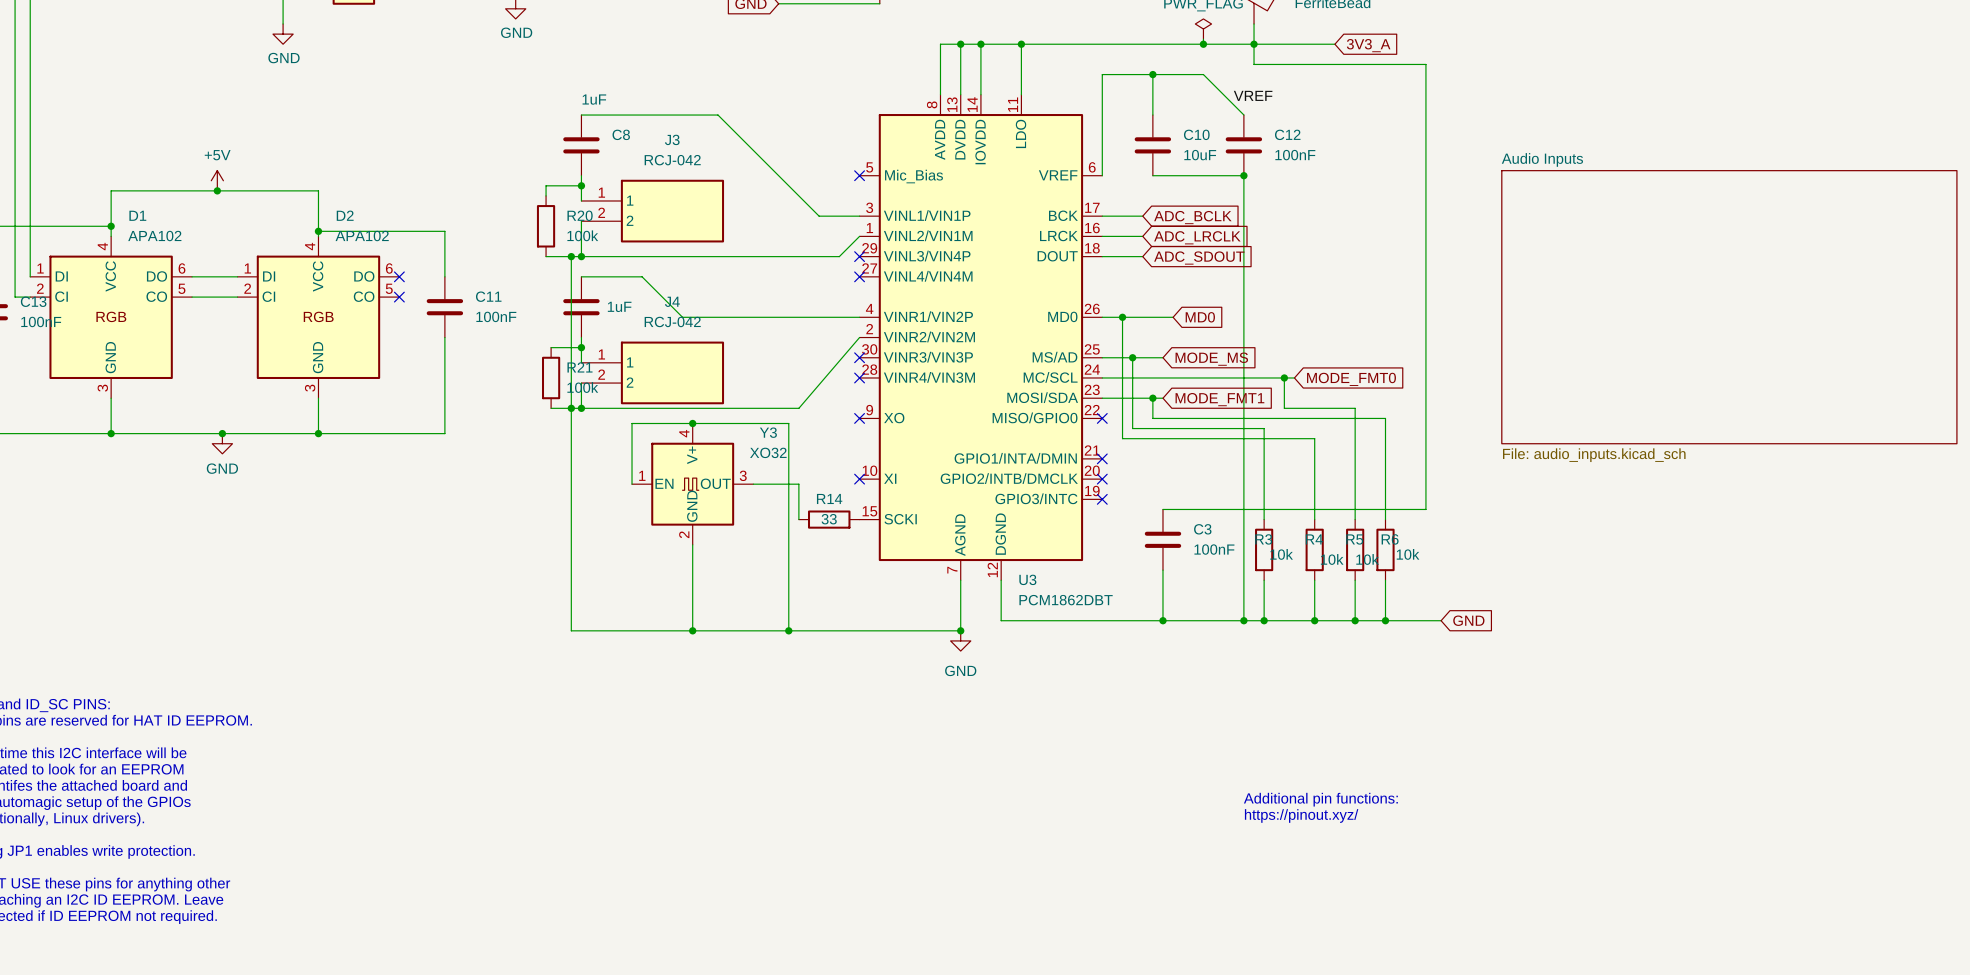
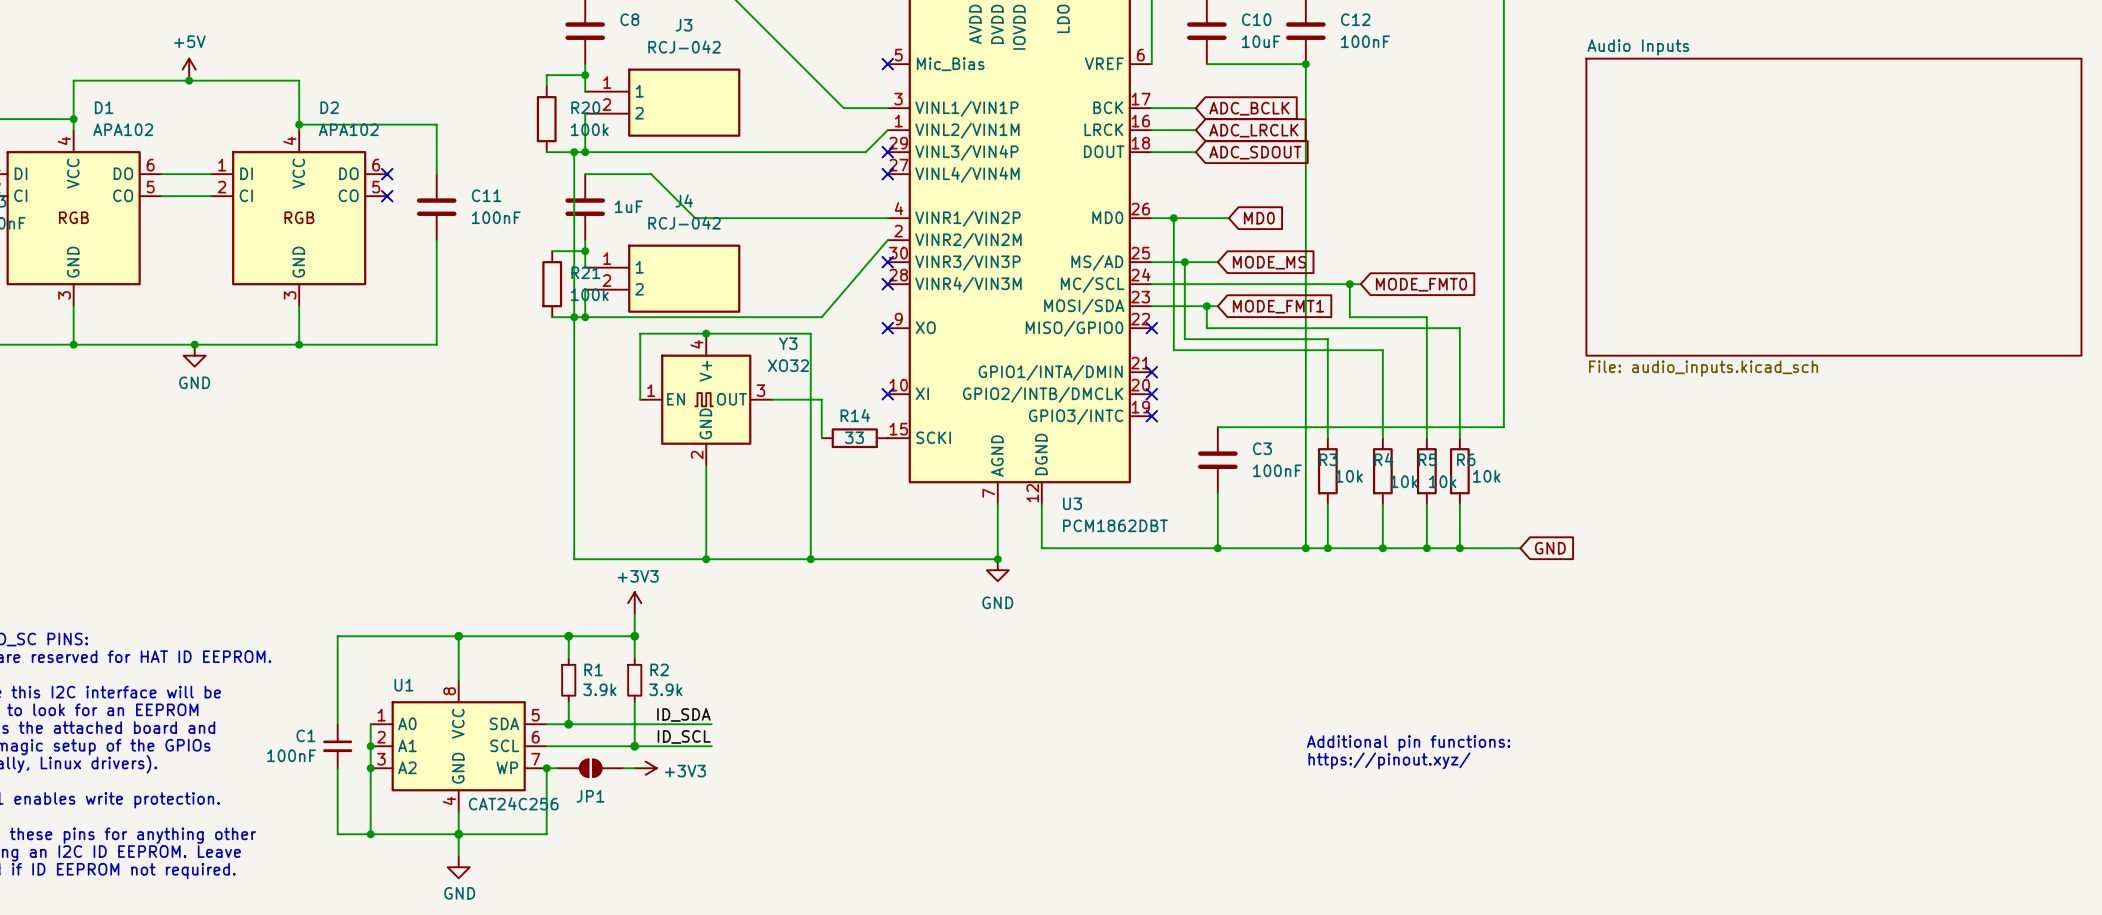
power symbol: none -> +3V3 (634, 603)
wire: none -> (634, 614) (634, 658)
wire: none -> (458, 636) (458, 680)
junction: none -> (458, 636)
wire: none -> (568, 636) (568, 658)
junction: none -> (568, 636)
wire: none -> (634, 636) (337, 636) (337, 724)
junction: none -> (634, 636)
R1: none -> 3.9k (568, 680)
R2: none -> 3.9k (634, 680)
wire: none -> (568, 702) (568, 724)
wire: none -> (634, 702) (634, 746)
label: none -> ID_SDA (683, 714)
wire: none -> (370, 724) (370, 834)
wire: none -> (546, 724) (711, 724)
junction: none -> (568, 724)
label: none -> ID_SCL (684, 736)
C1: none -> 100nF (337, 746)
junction: none -> (370, 746)
U1: none -> CAT24C256 (458, 746)
wire: none -> (546, 746) (711, 746)
junction: none -> (634, 746)
wire: none -> (337, 768) (337, 834) (546, 834) (546, 768) (557, 768)
junction: none -> (370, 768)
junction: none -> (546, 768)
JP1: none -> (590, 768)
wire: none -> (623, 768) (634, 768)
power symbol: none -> +3V3 (645, 768)
wire: none -> (458, 812) (458, 856)
junction: none -> (370, 834)
junction: none -> (458, 834)
power symbol: none -> GND (458, 867)

